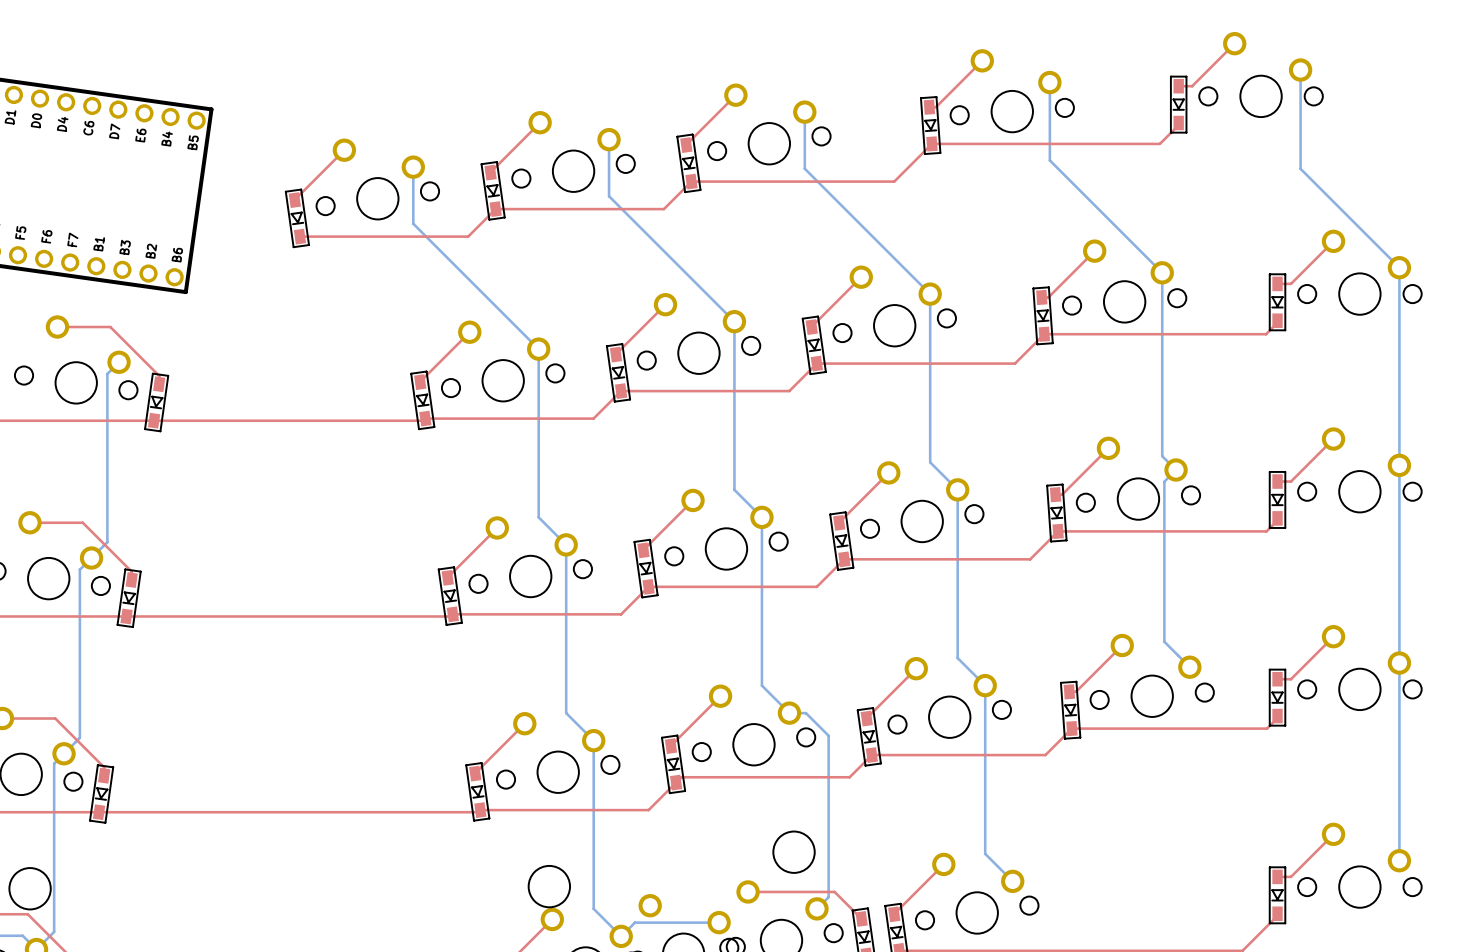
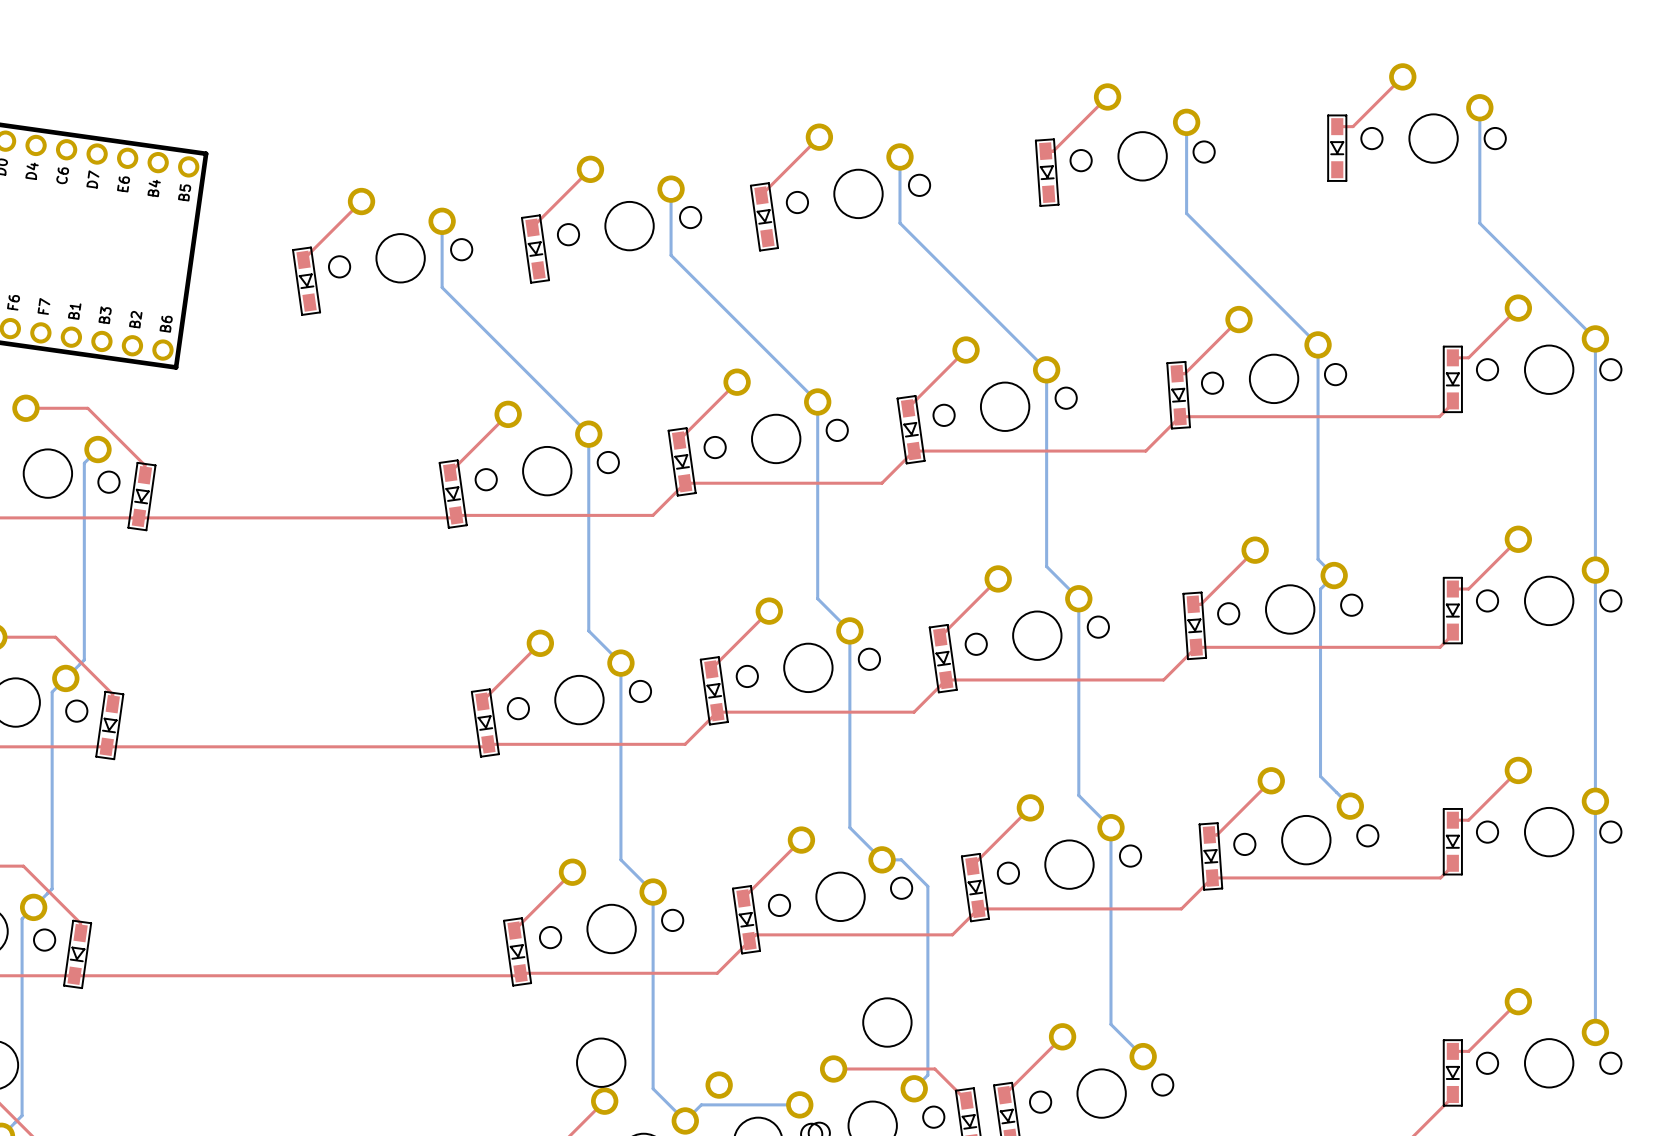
top track: (1178, 123) (1159, 143) (931, 143) (894, 181) (691, 181) (663, 209) (495, 209) (468, 236) (299, 236) -> none

